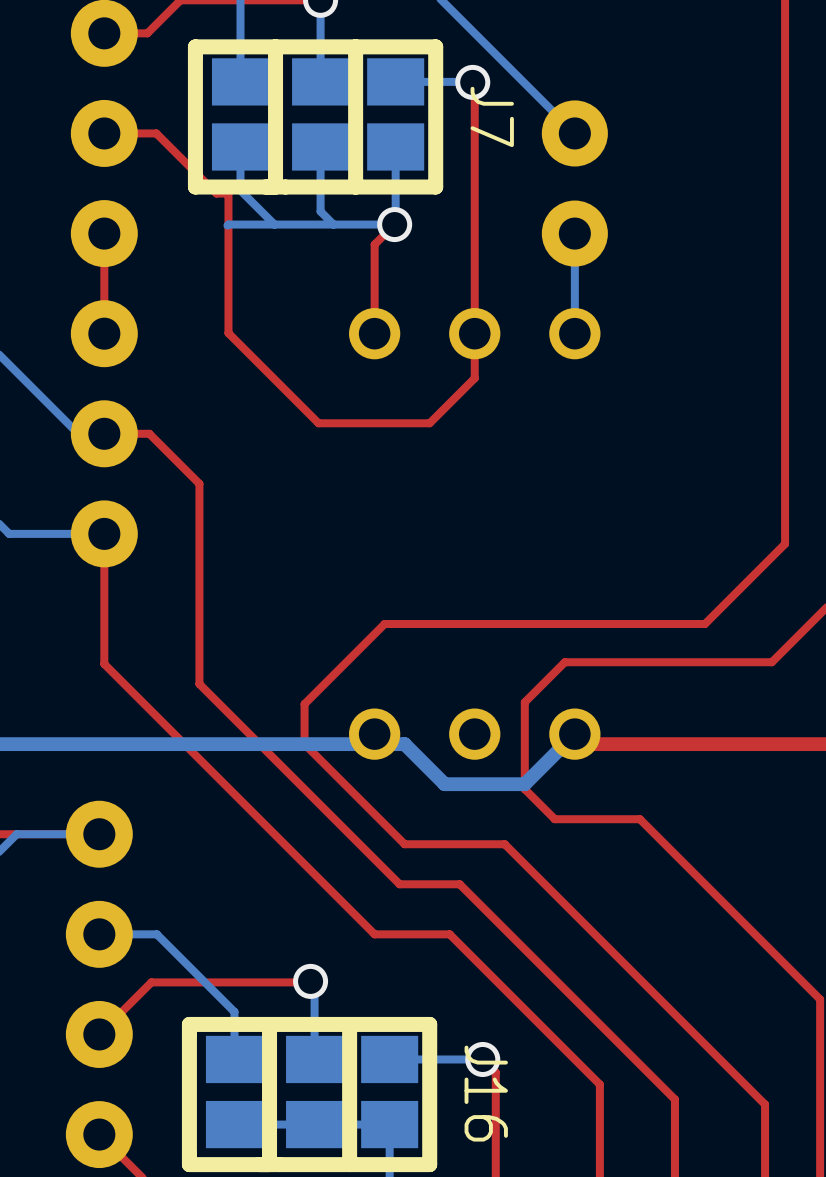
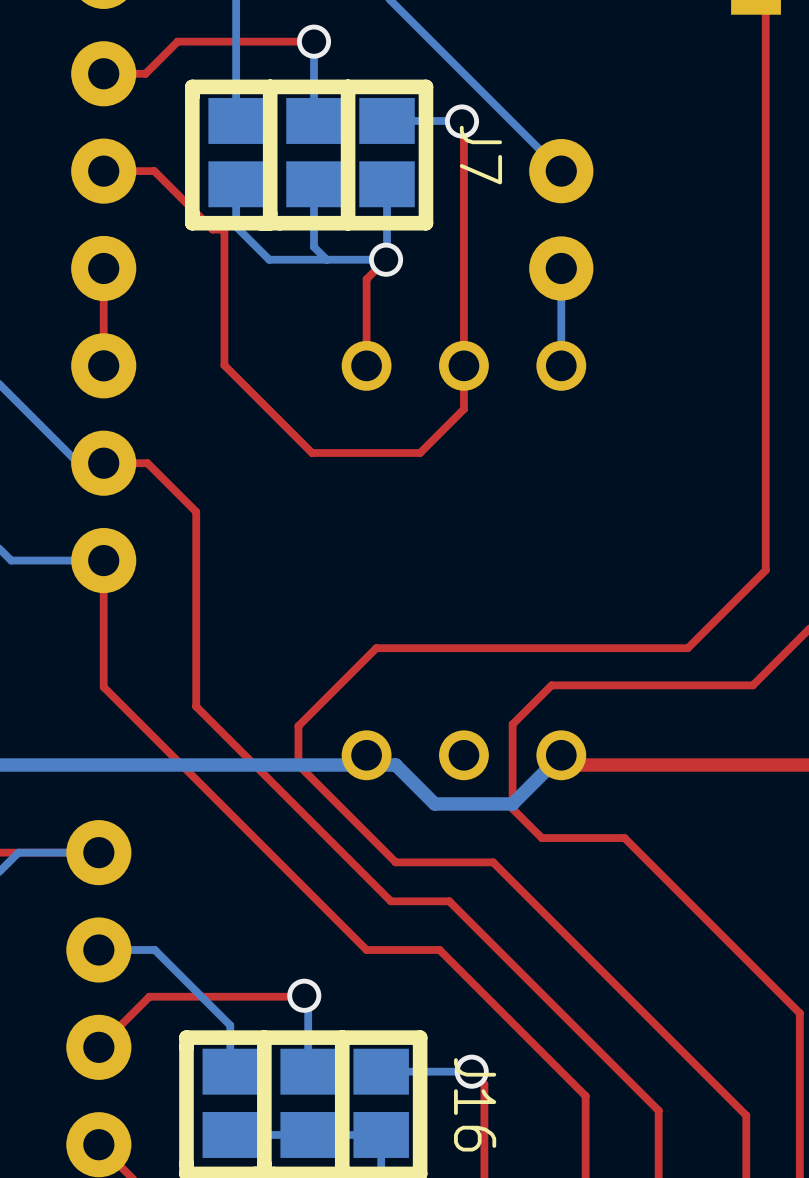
bottom track: (274, 224) (227, 225) -> none

